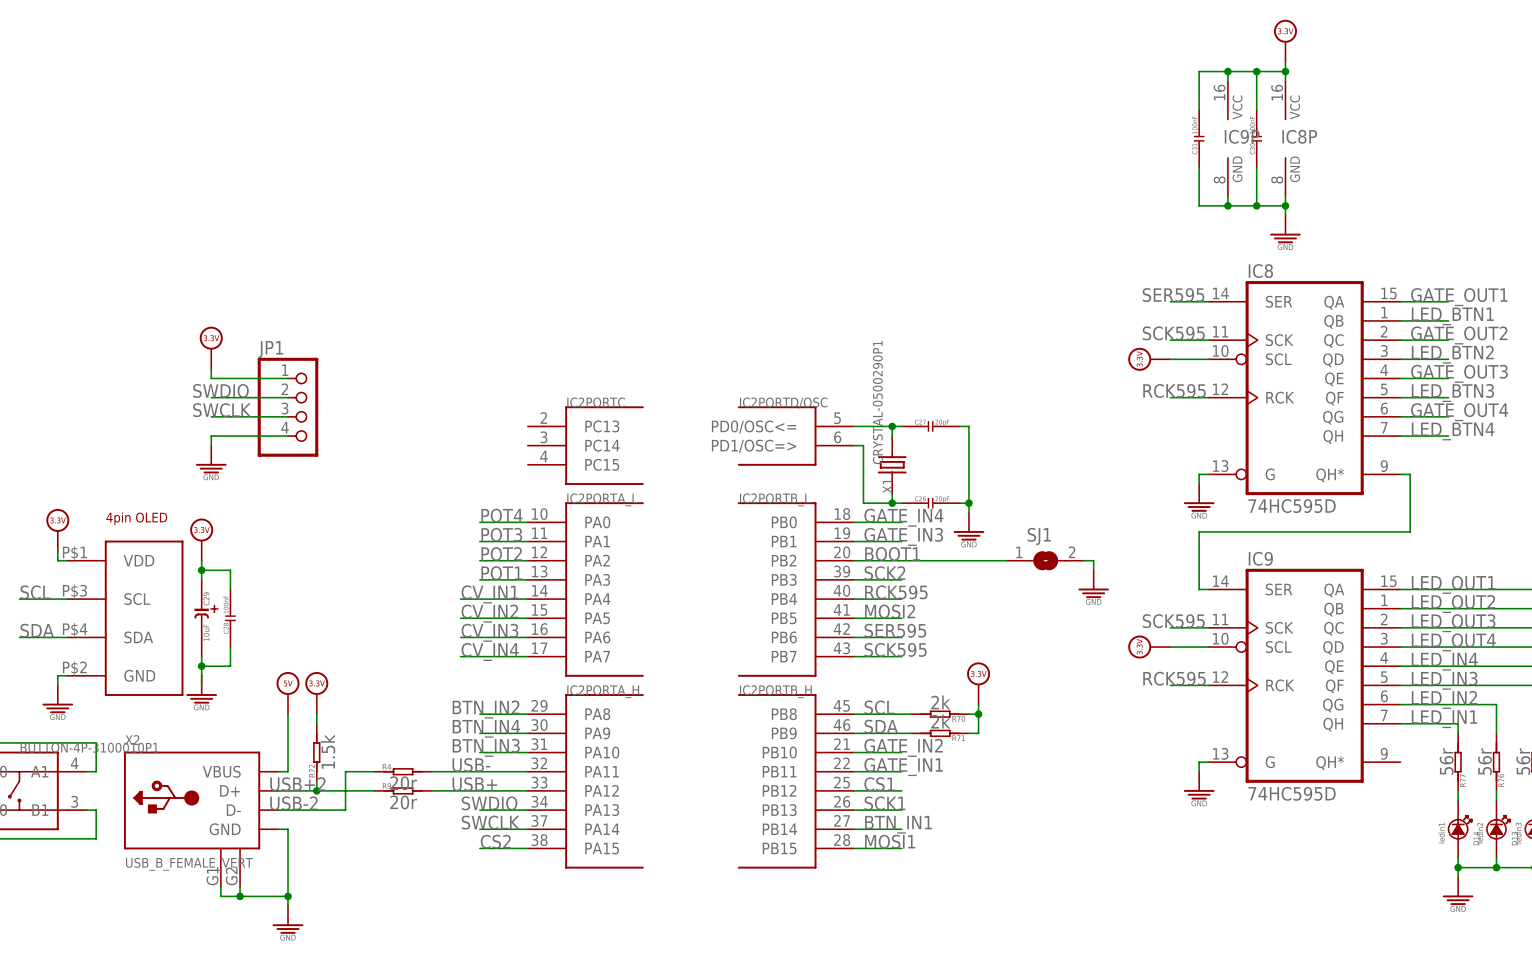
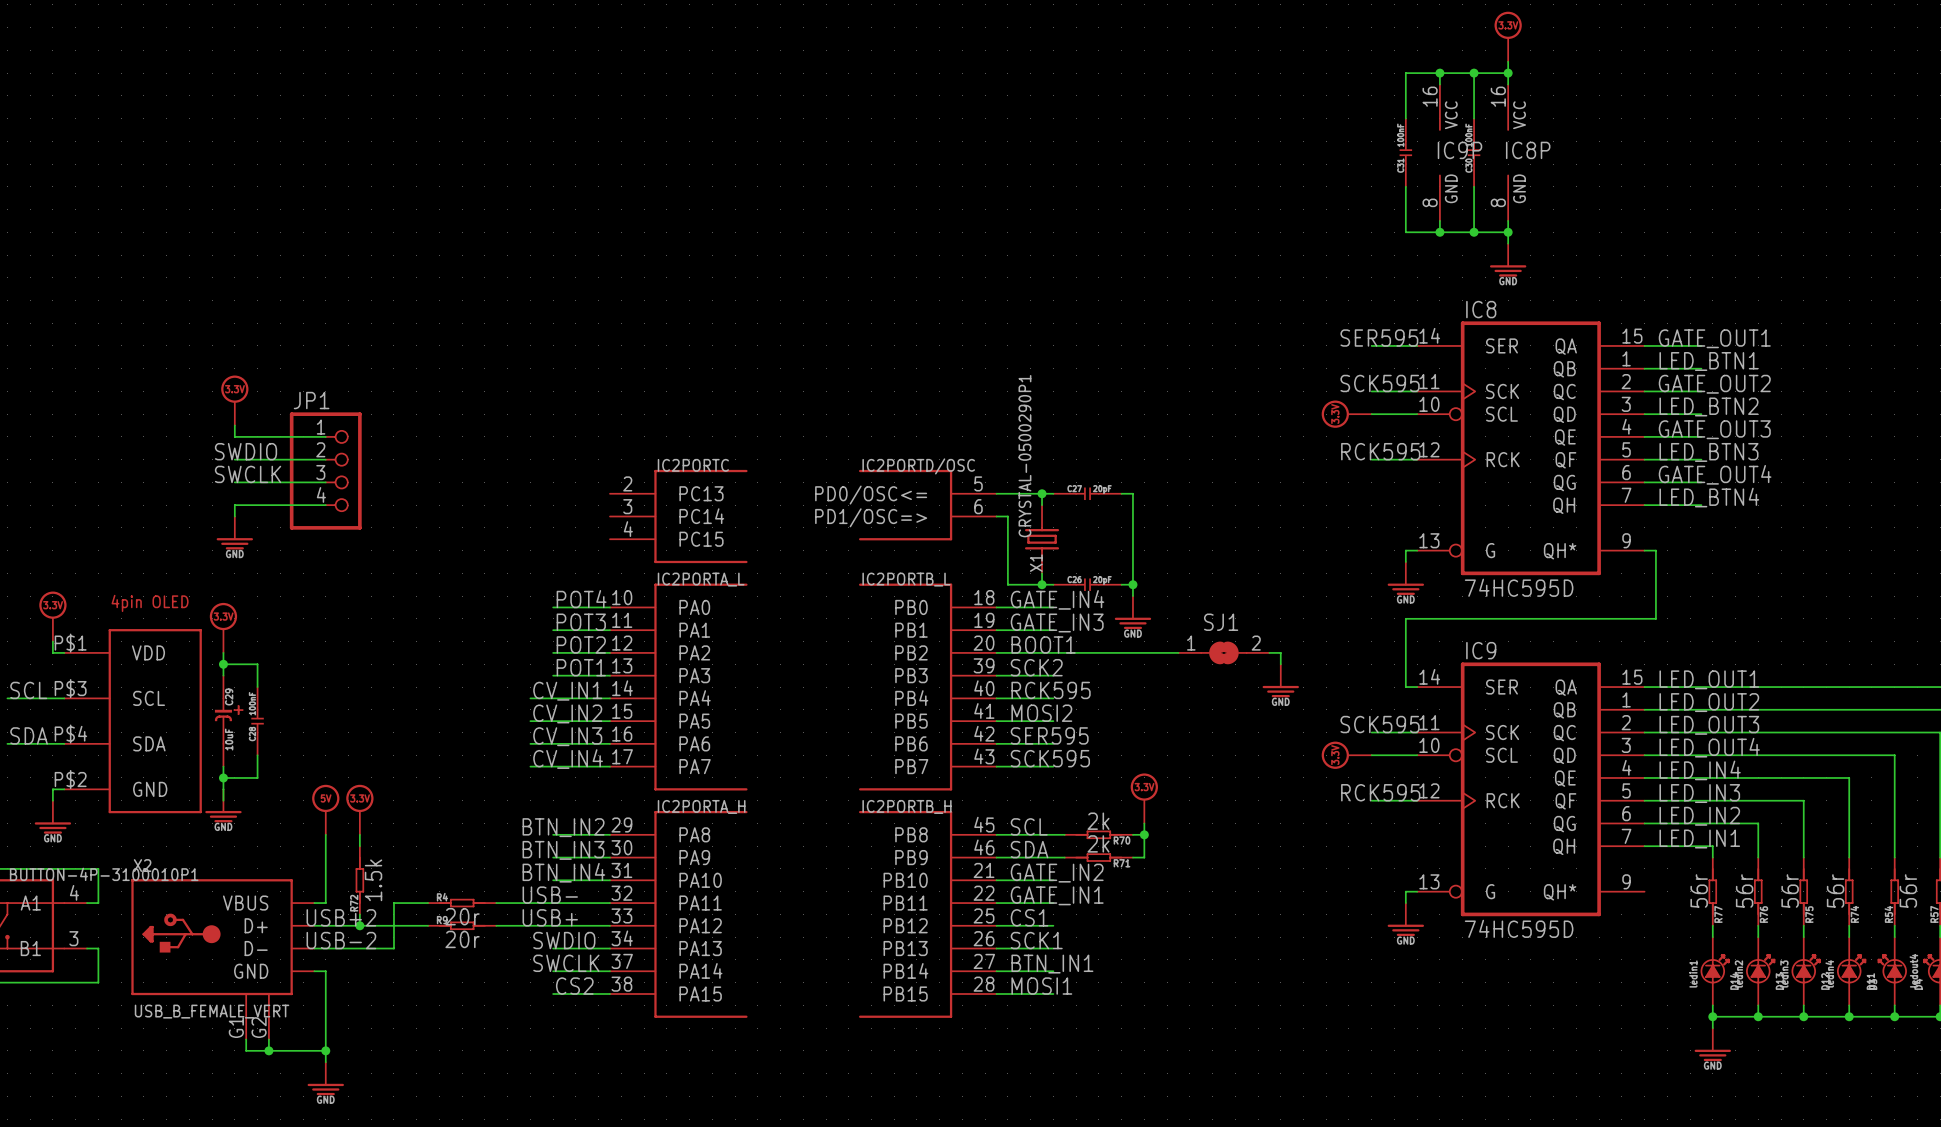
label: BTN_IN4 (486, 728) -> BTN_IN3 (563, 850)
label: BTN_IN3 (486, 747) -> BTN_IN4 (563, 872)

